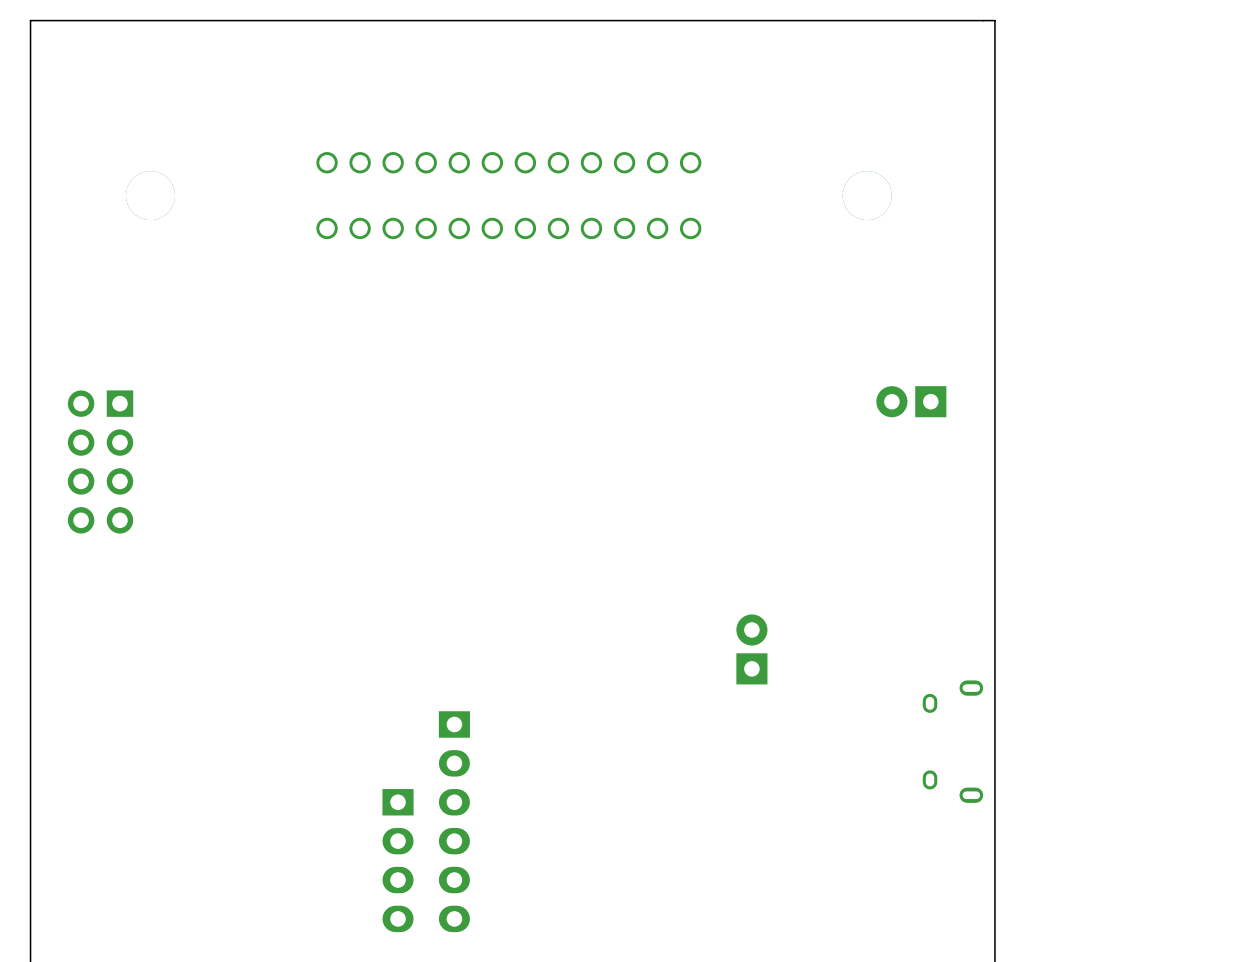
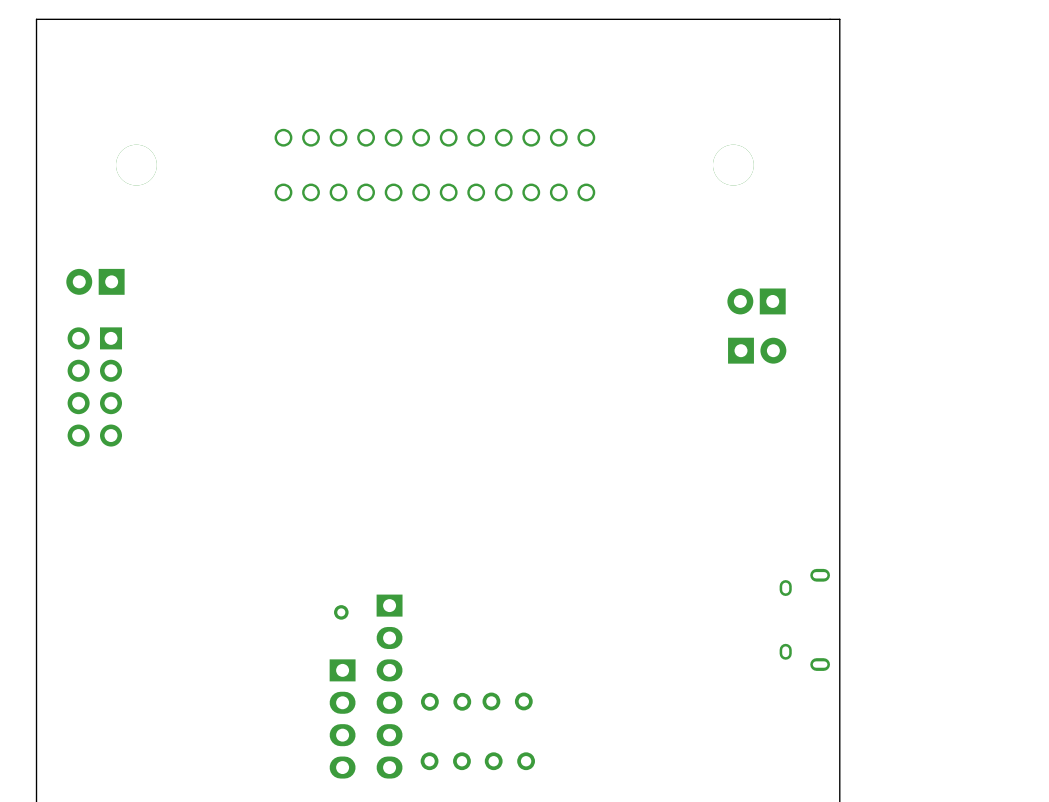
part: none -> (95, 281)
part: none -> (756, 301)
part: (911, 401) -> none
part: none -> (757, 350)
part: (751, 649) -> none
part: none -> (341, 612)
part: none -> (446, 701)
part: none -> (507, 701)
part: none -> (445, 761)
part: none -> (509, 761)

